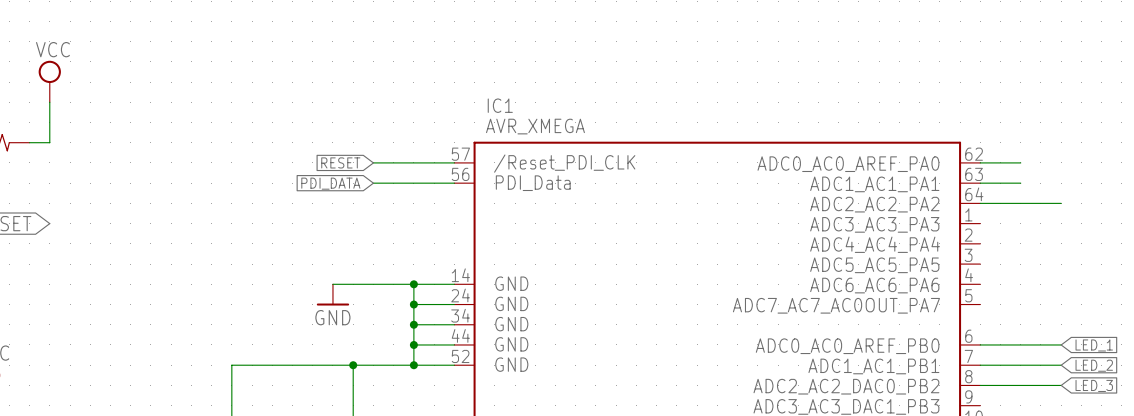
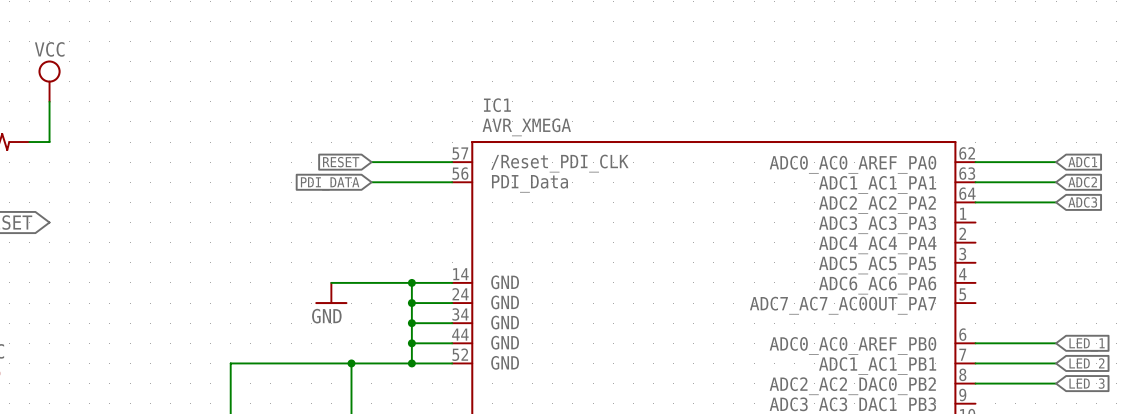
wire: none -> (1015, 162) (1056, 162)
global label: none -> ADC1 (1082, 162)
wire: none -> (1015, 182) (1056, 182)
global label: none -> ADC2 (1082, 182)
global label: none -> ADC3 (1082, 202)

